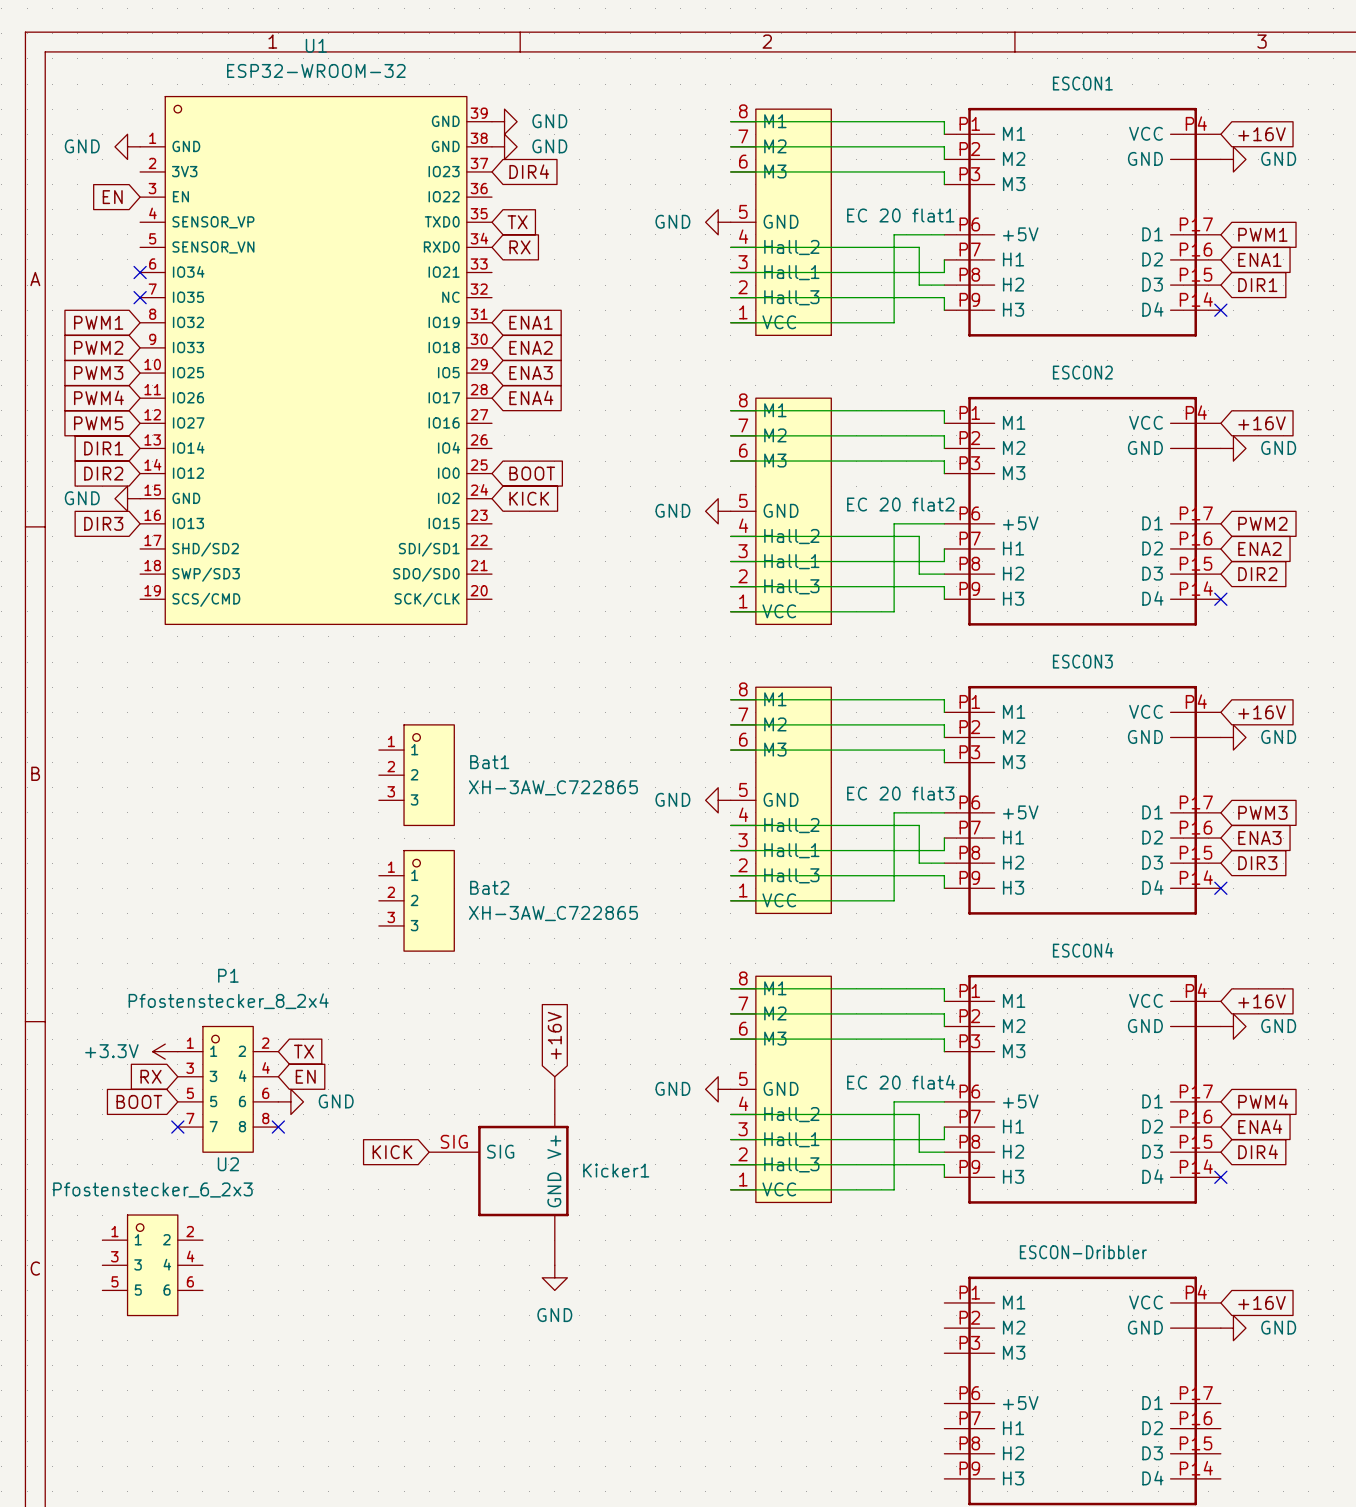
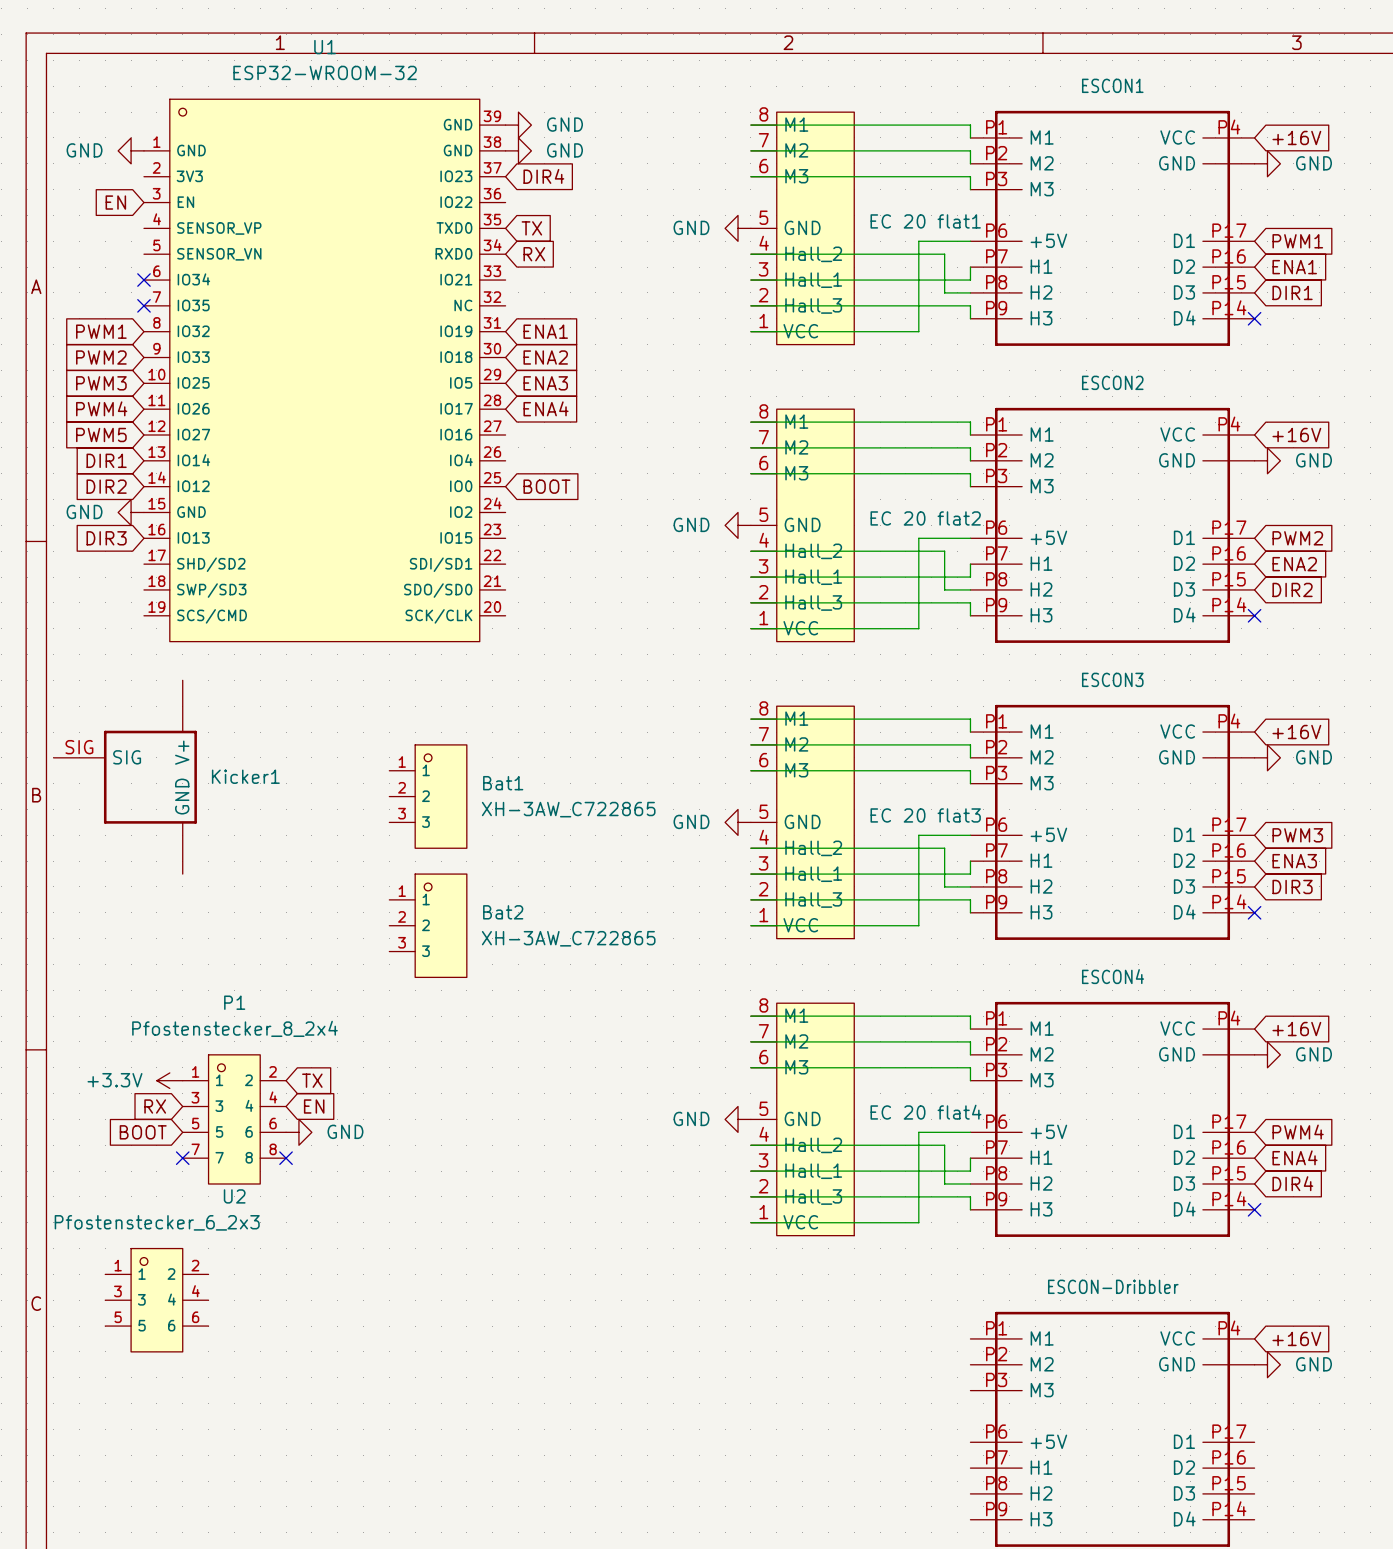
global label: KICK (529, 498) -> none
global label: +16V (554, 1035) -> none
global label: KICK (392, 1152) -> none
Kicker1 position: (498, 1171) -> (125, 777)
power symbol: GND (554, 1277) -> none

